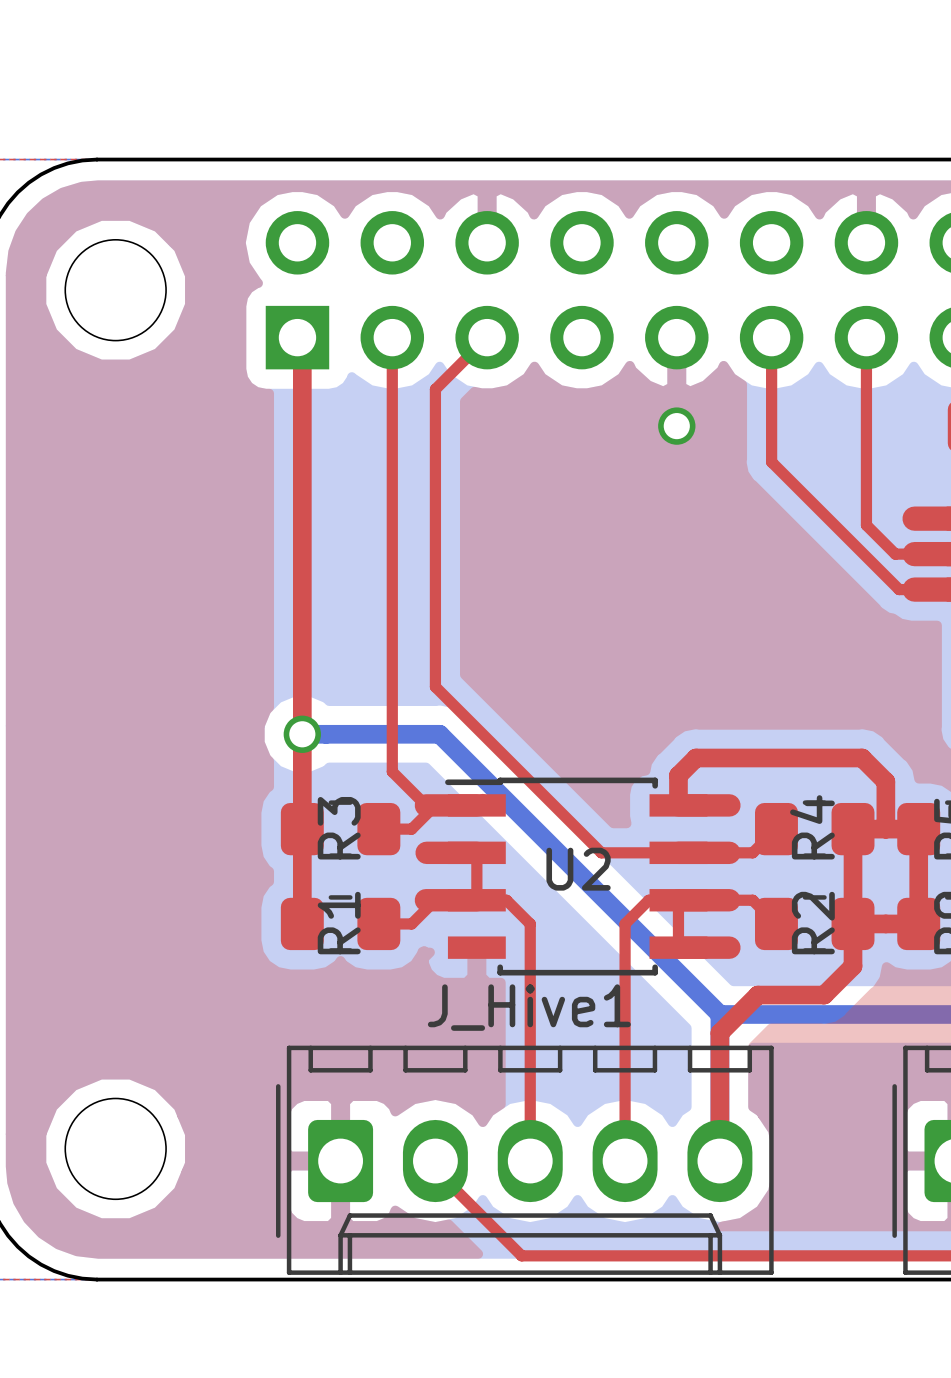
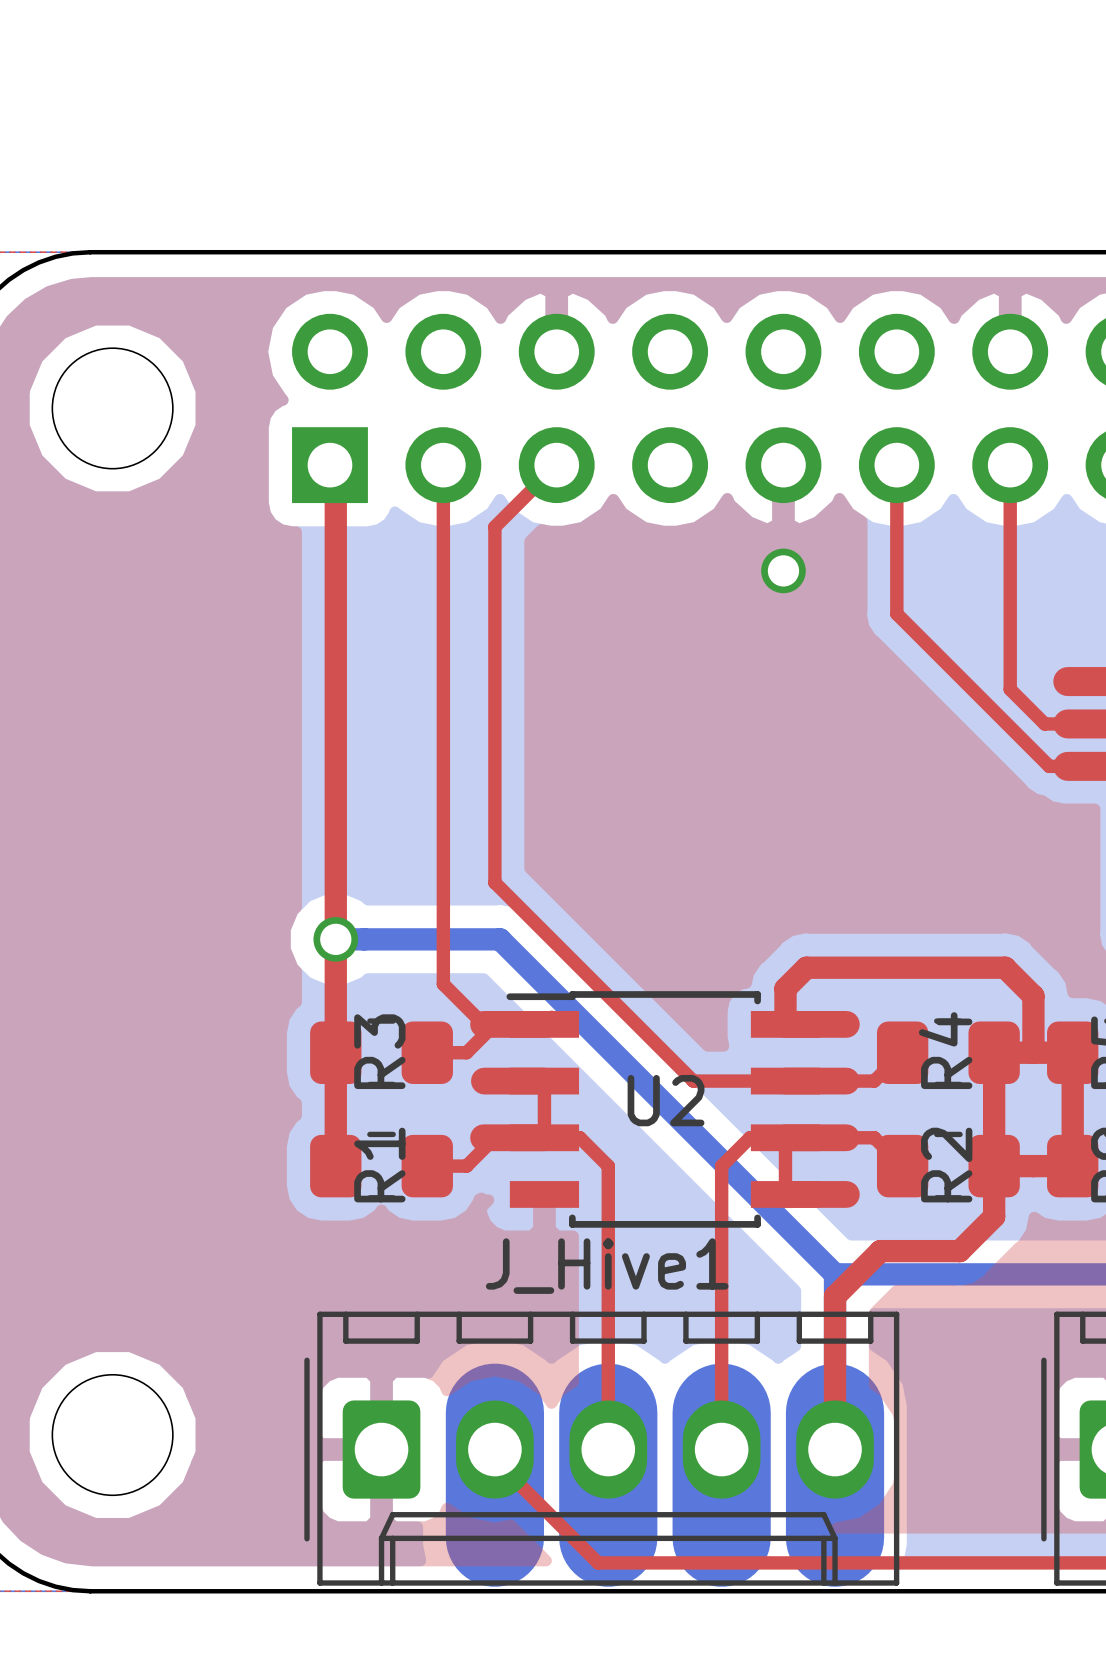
bottom track: none -> (494, 1412) (494, 1537)
bottom track: none -> (608, 1412) (608, 1537)
bottom track: none -> (721, 1412) (721, 1537)
bottom track: none -> (835, 1412) (835, 1537)

